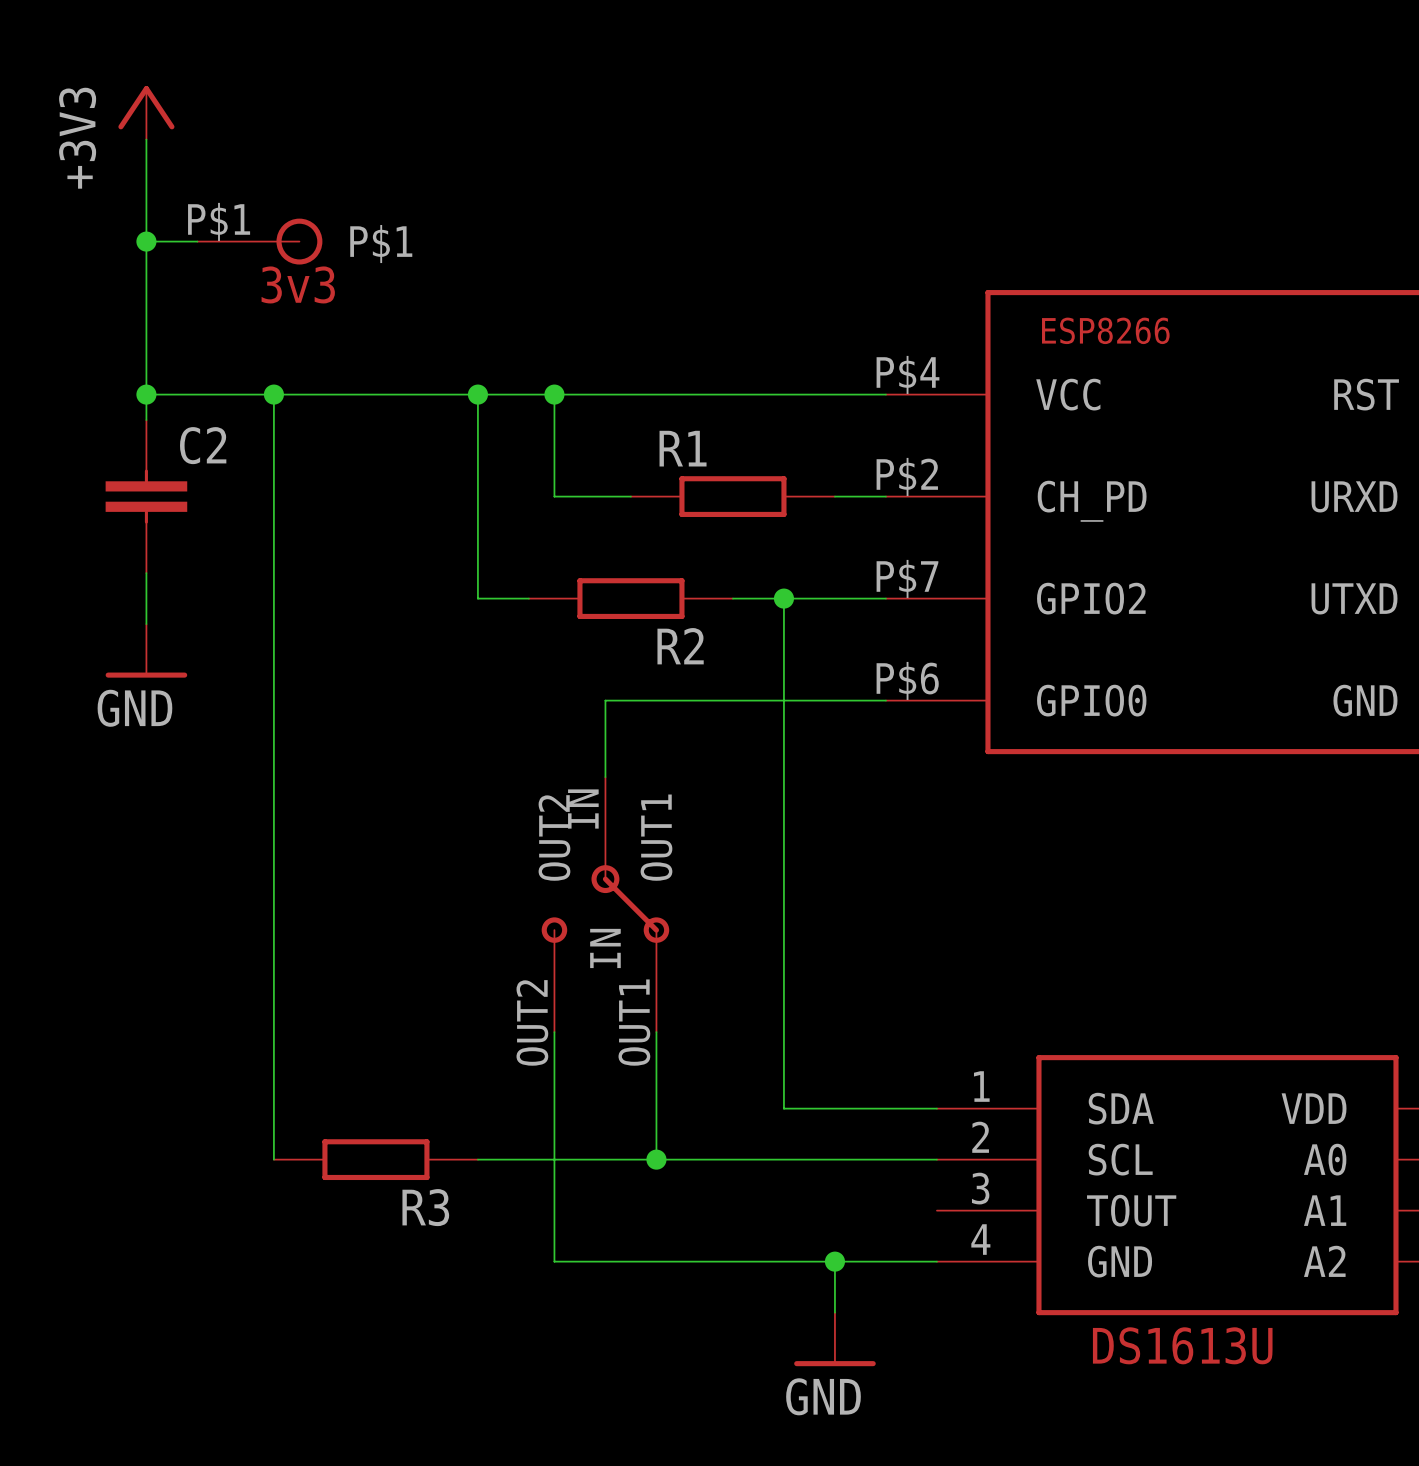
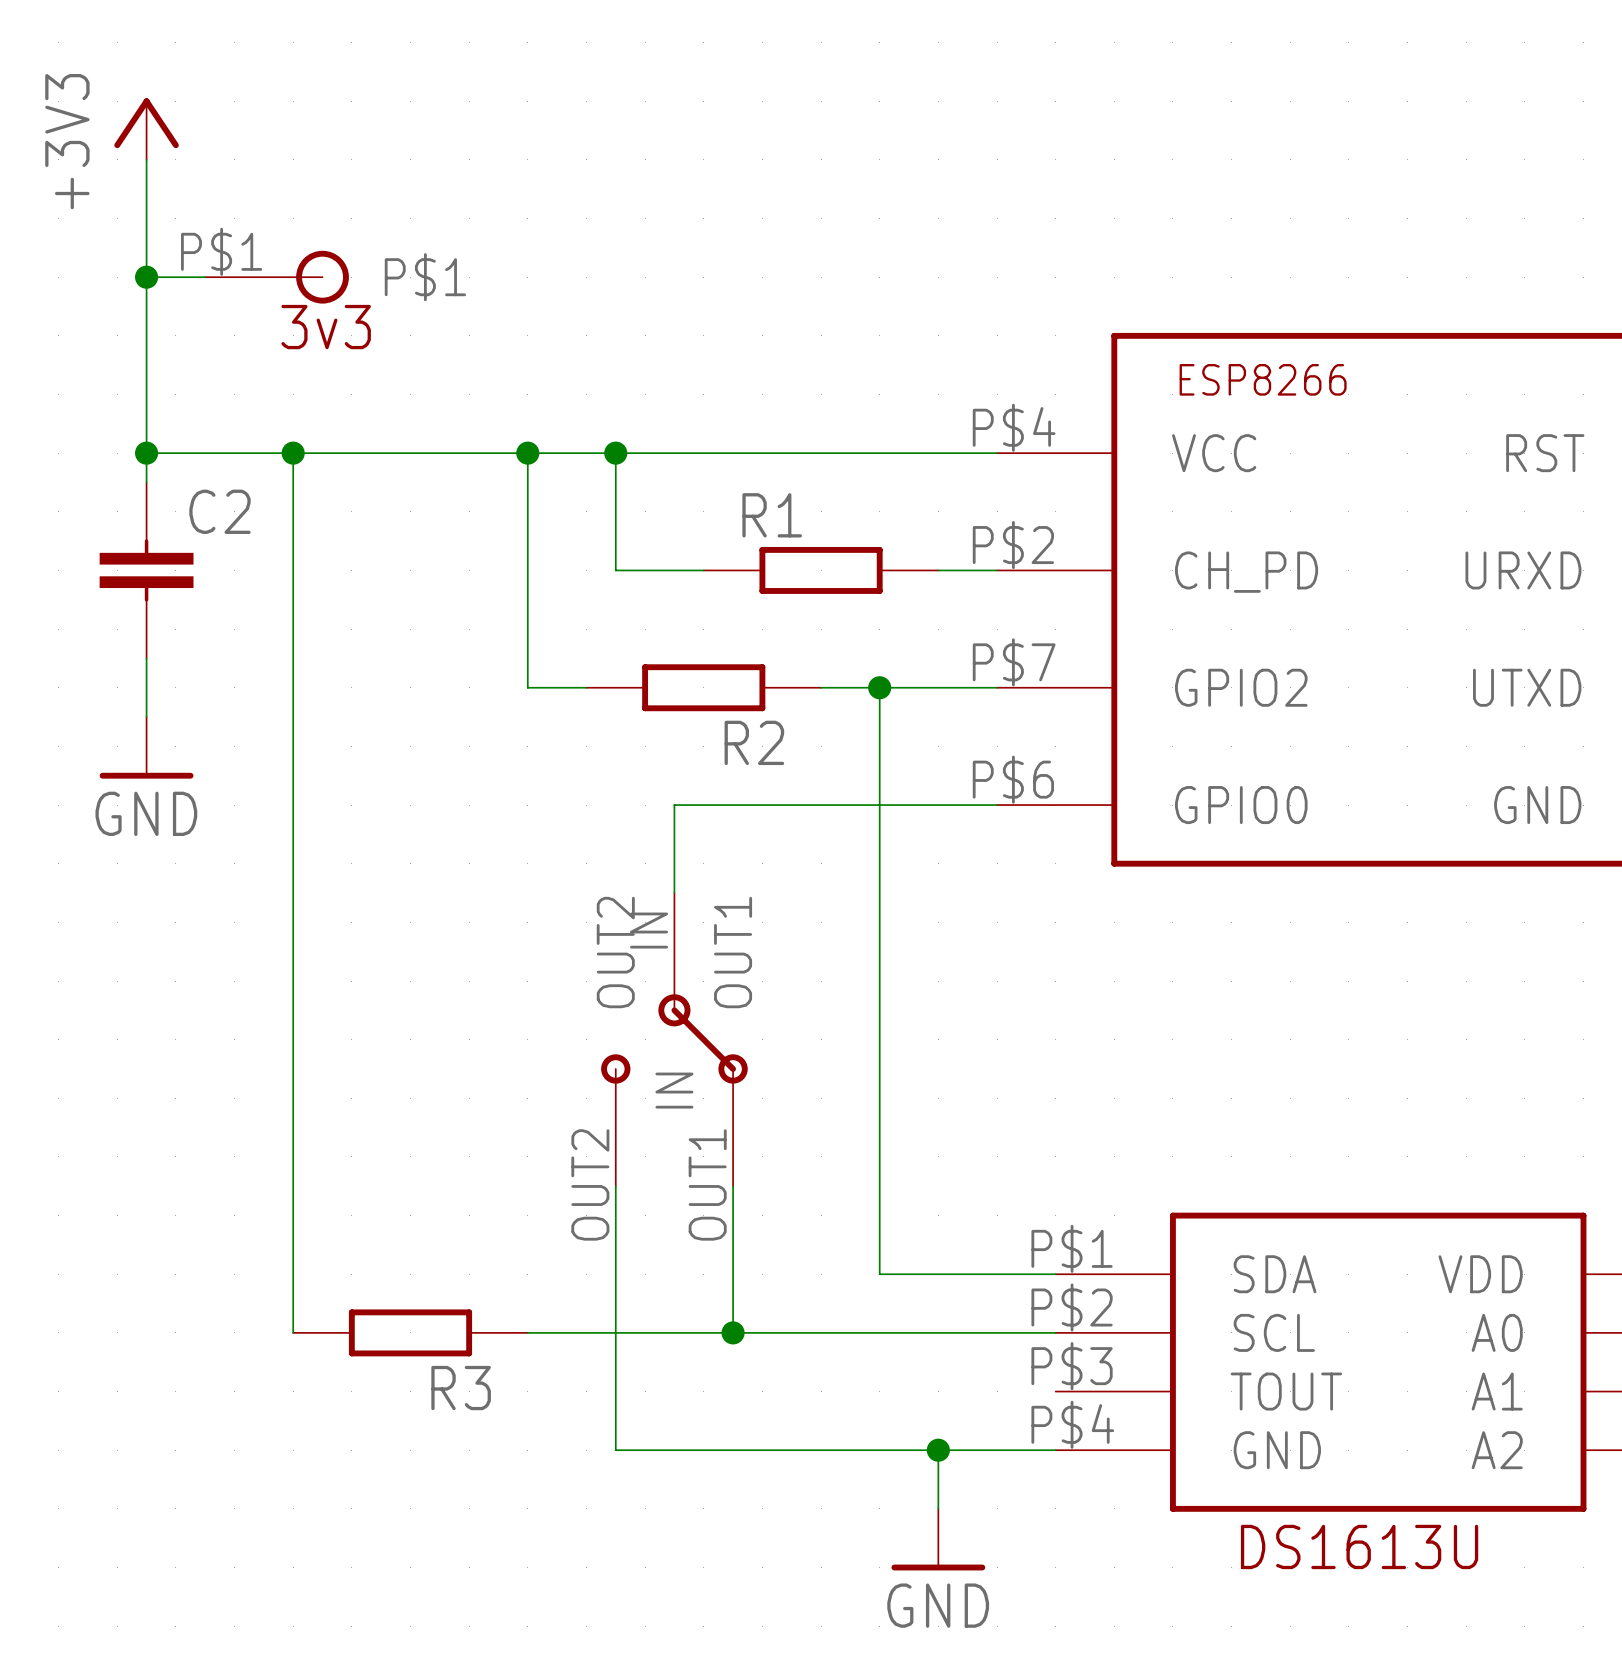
part pin number: 1 (981, 1086) -> P$1 (1072, 1248)
part pin number: 2 (980, 1137) -> P$2 (1072, 1307)
part pin number: 3 (980, 1188) -> P$3 (1072, 1366)
part pin number: 4 (980, 1239) -> P$4 (1072, 1424)

